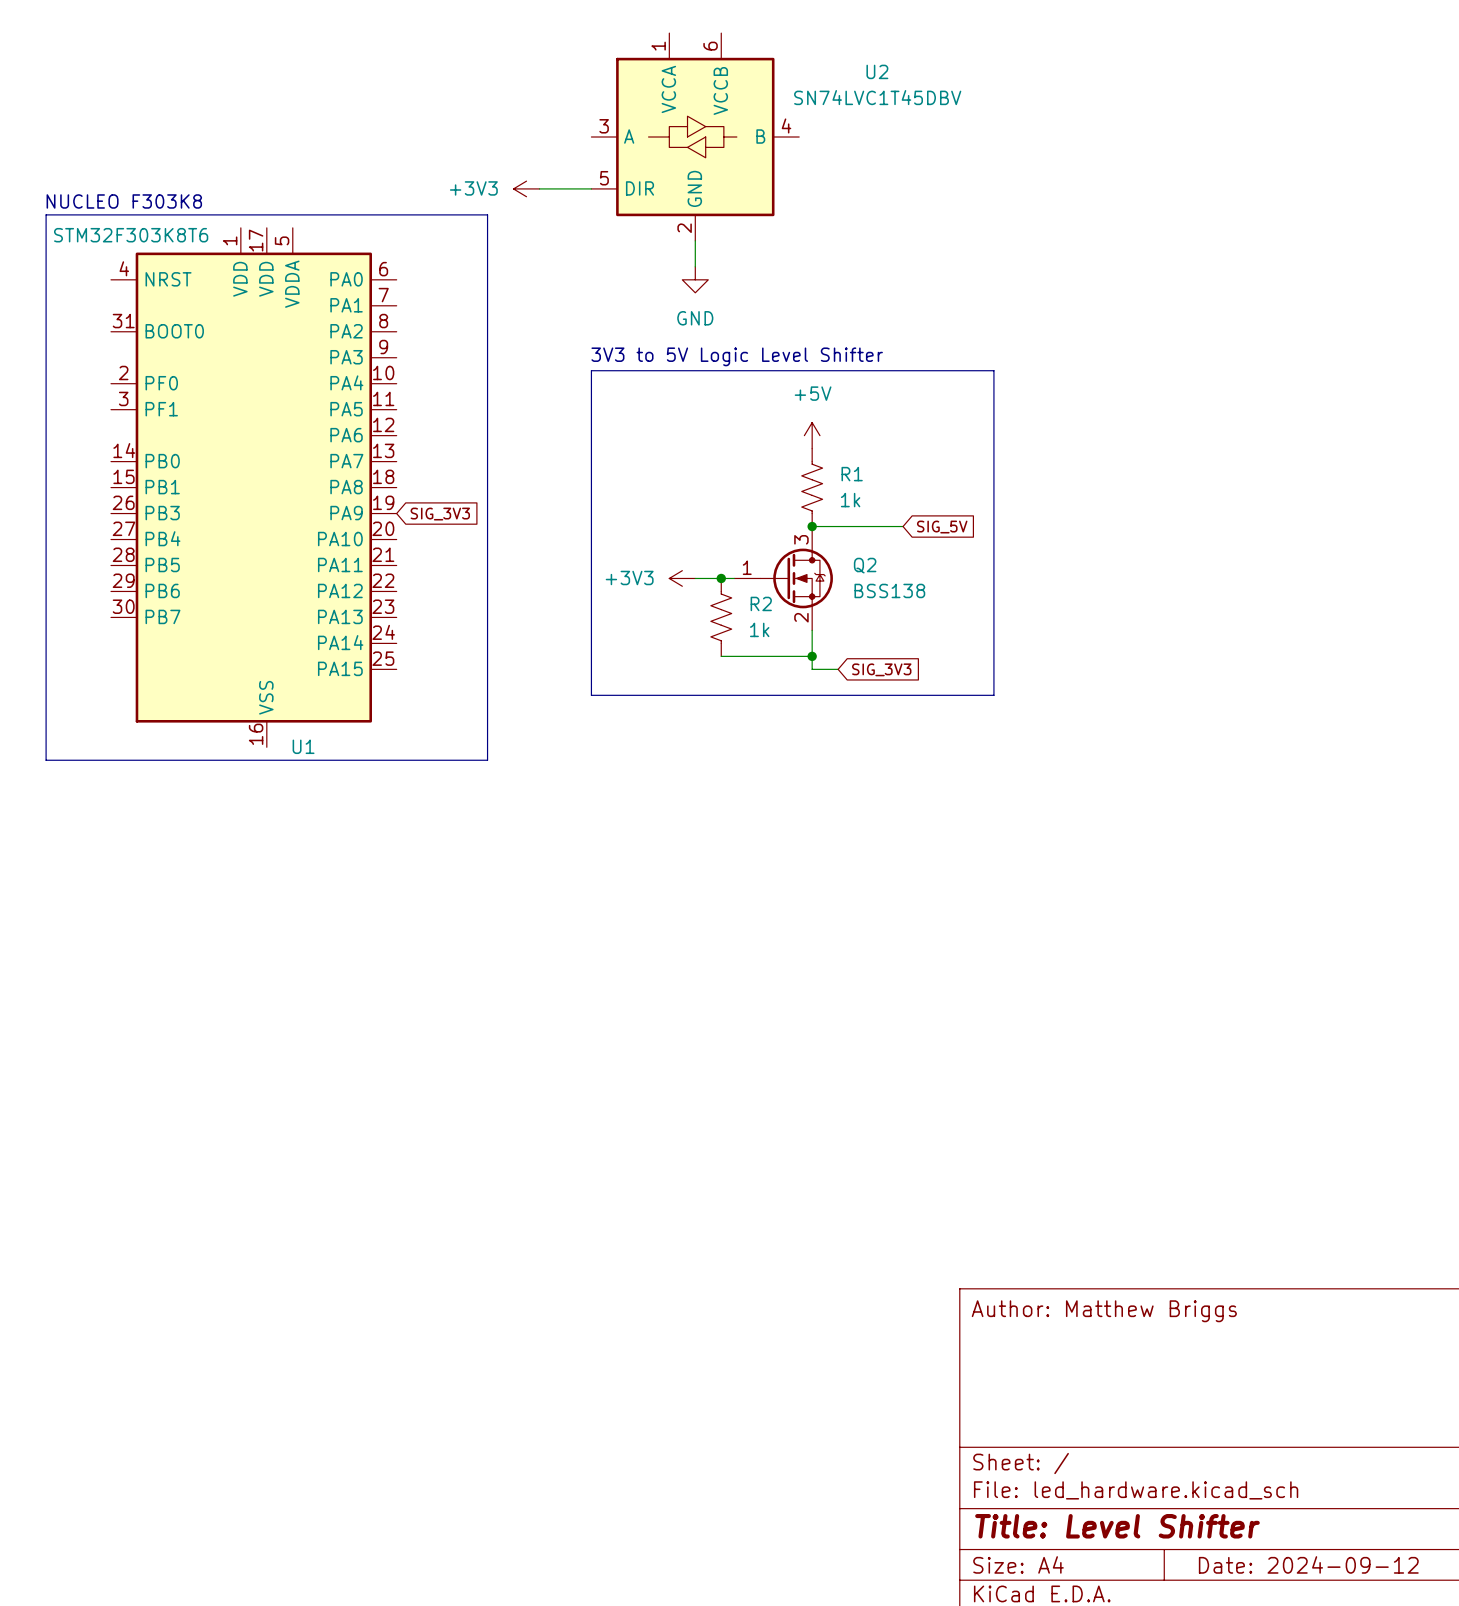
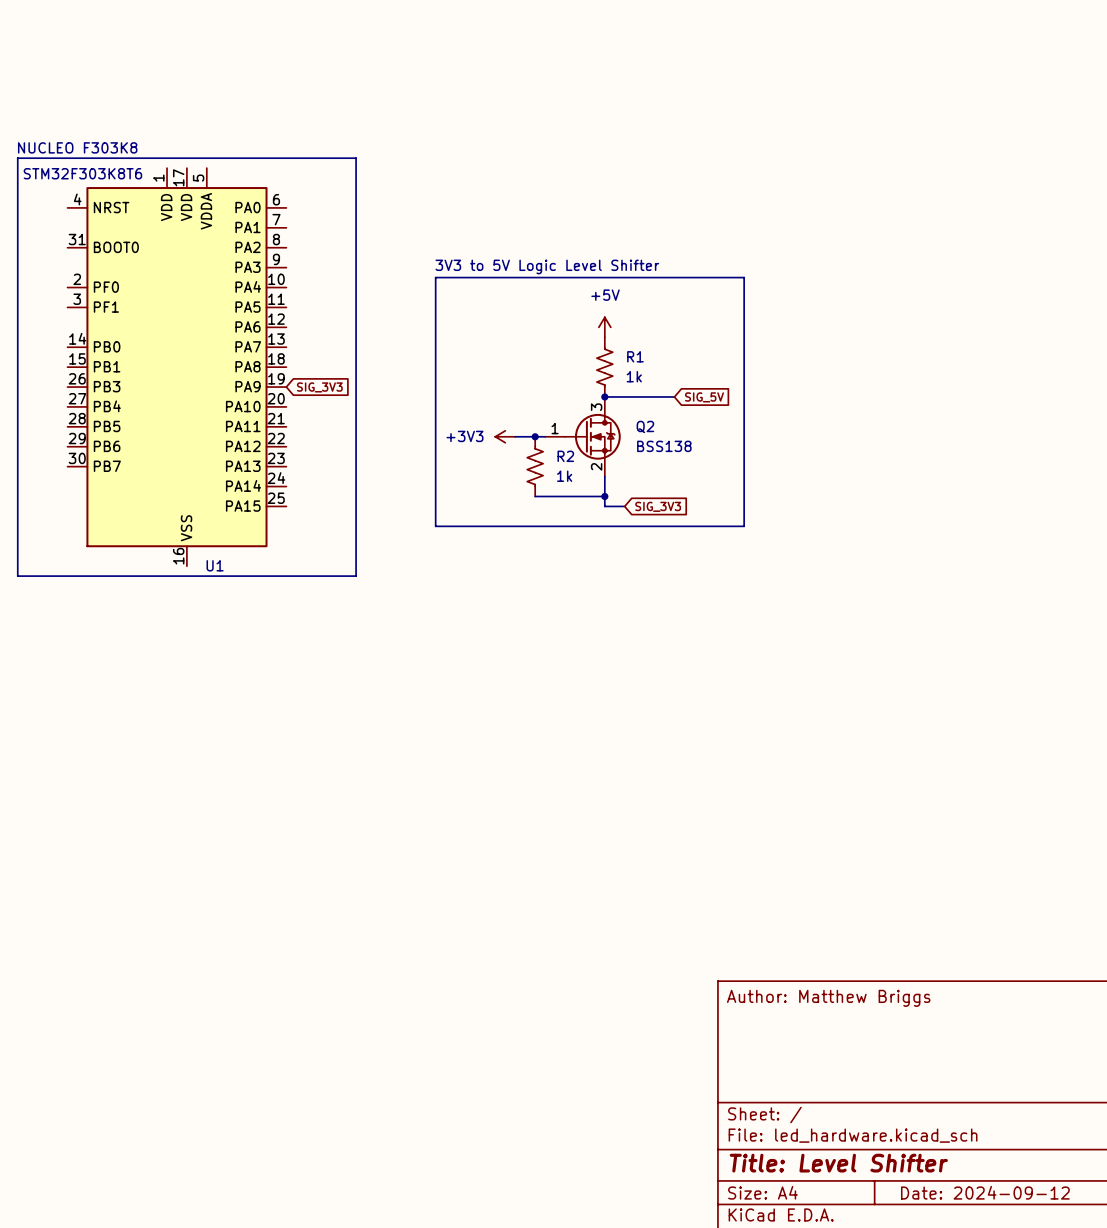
U2: SN74LVC1T45DBV (695, 137) -> none
power symbol: +3V3 (526, 188) -> none
wire: (539, 188) (591, 188) -> none
wire: (695, 240) (695, 266) -> none
power symbol: GND (695, 279) -> none

